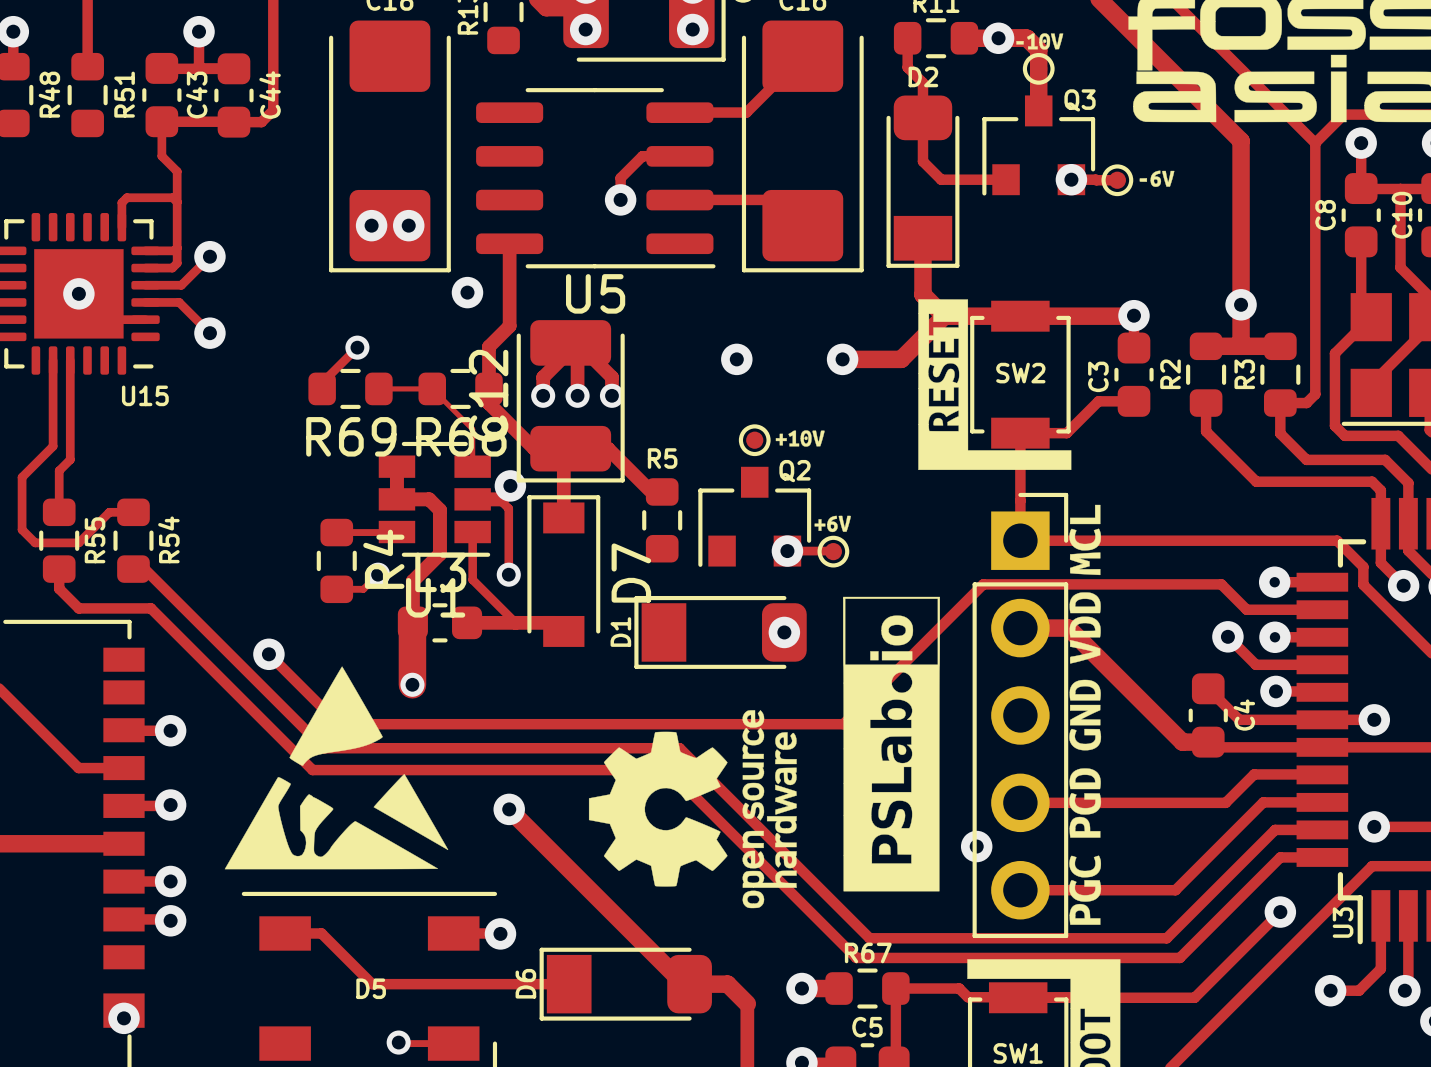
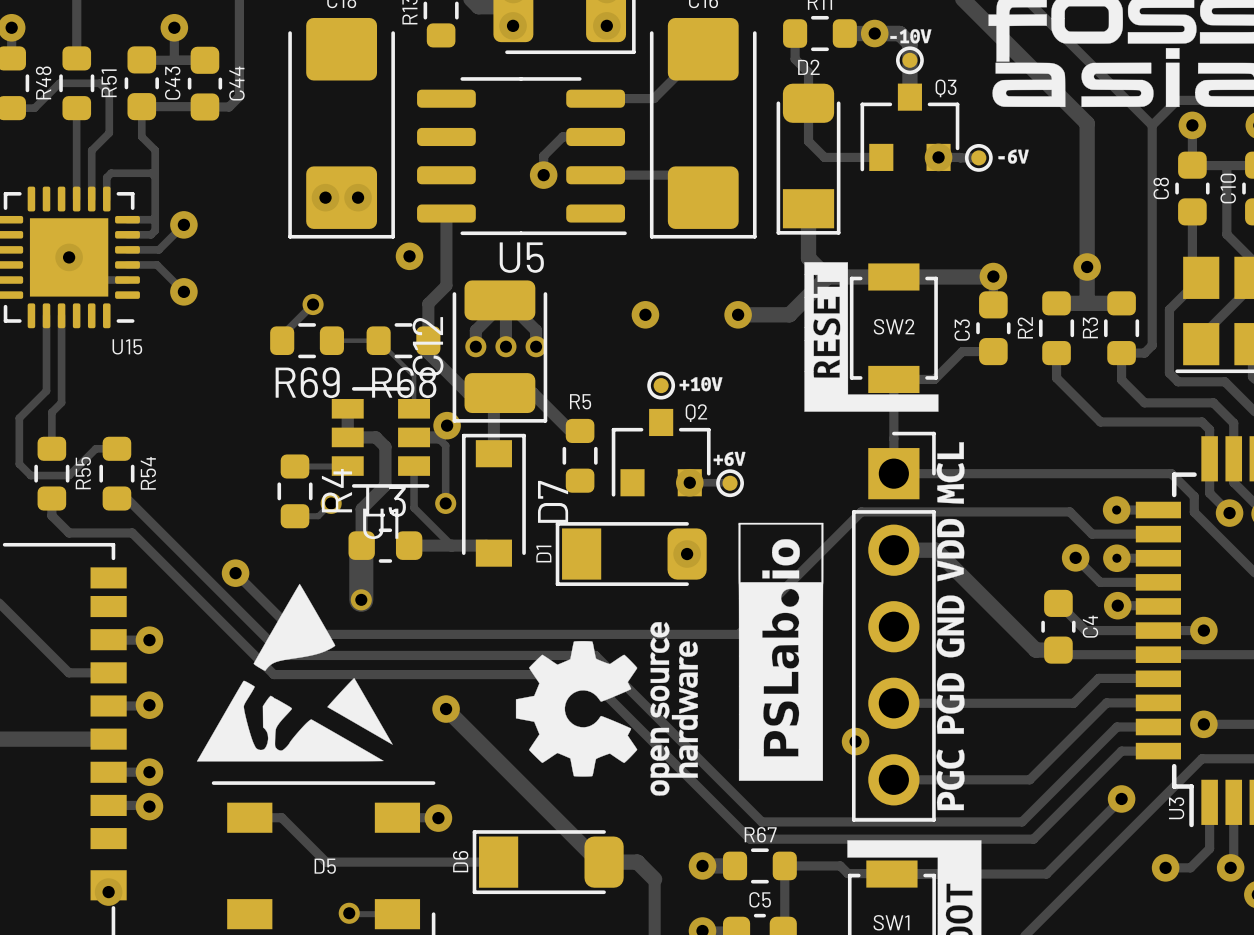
track: none -> (11, 108) (34, 108) (59, 83) (99, 83) (109, 92) (109, 133) (91, 150) (91, 199)
track: none -> (76, 108) (76, 199)

